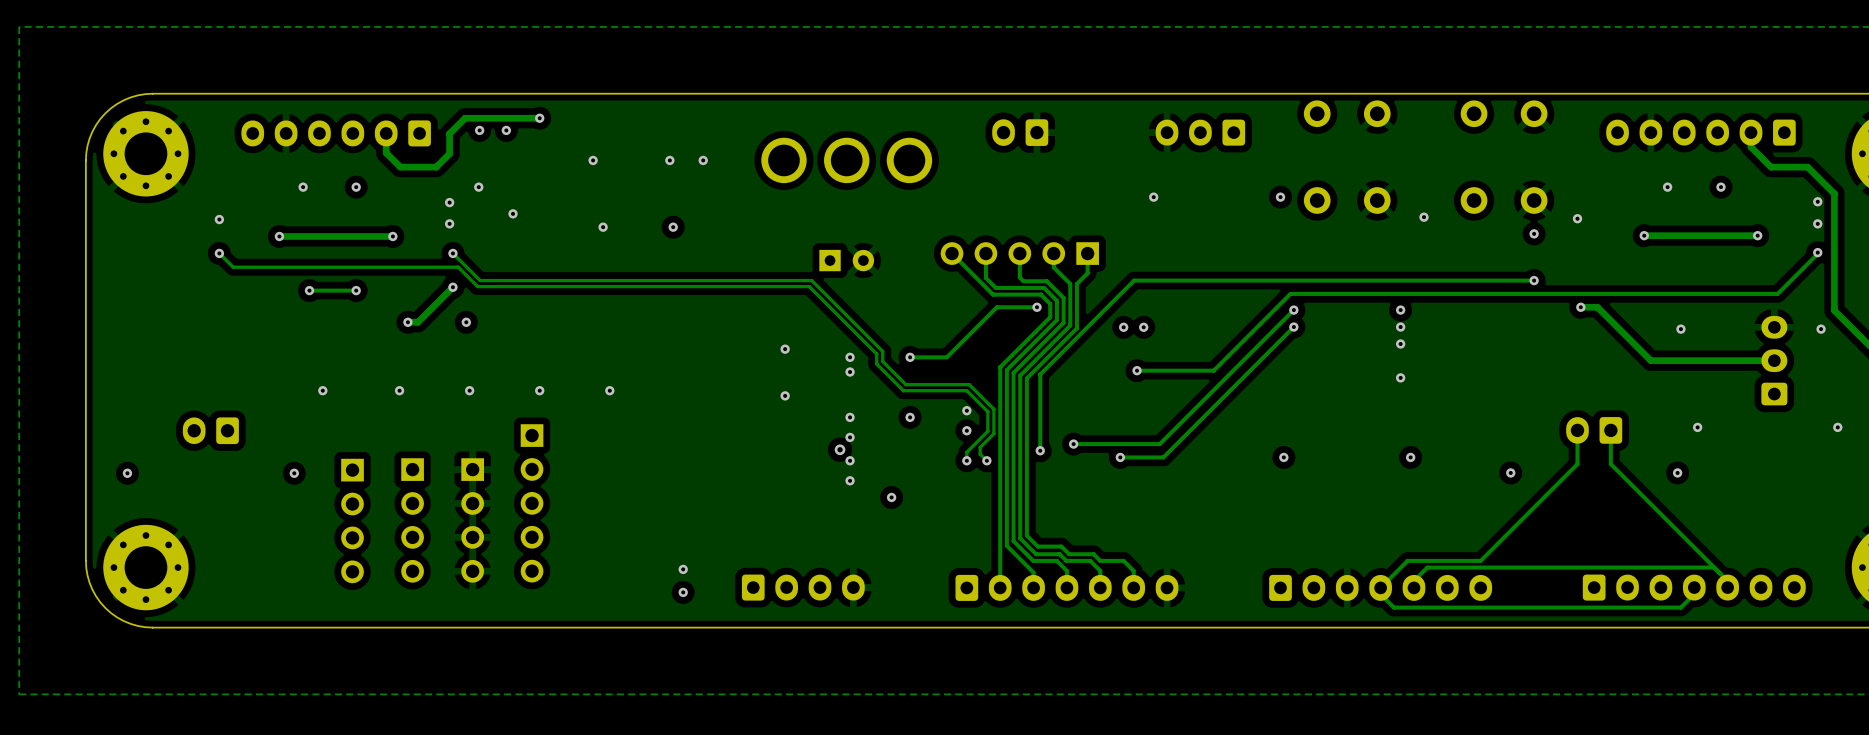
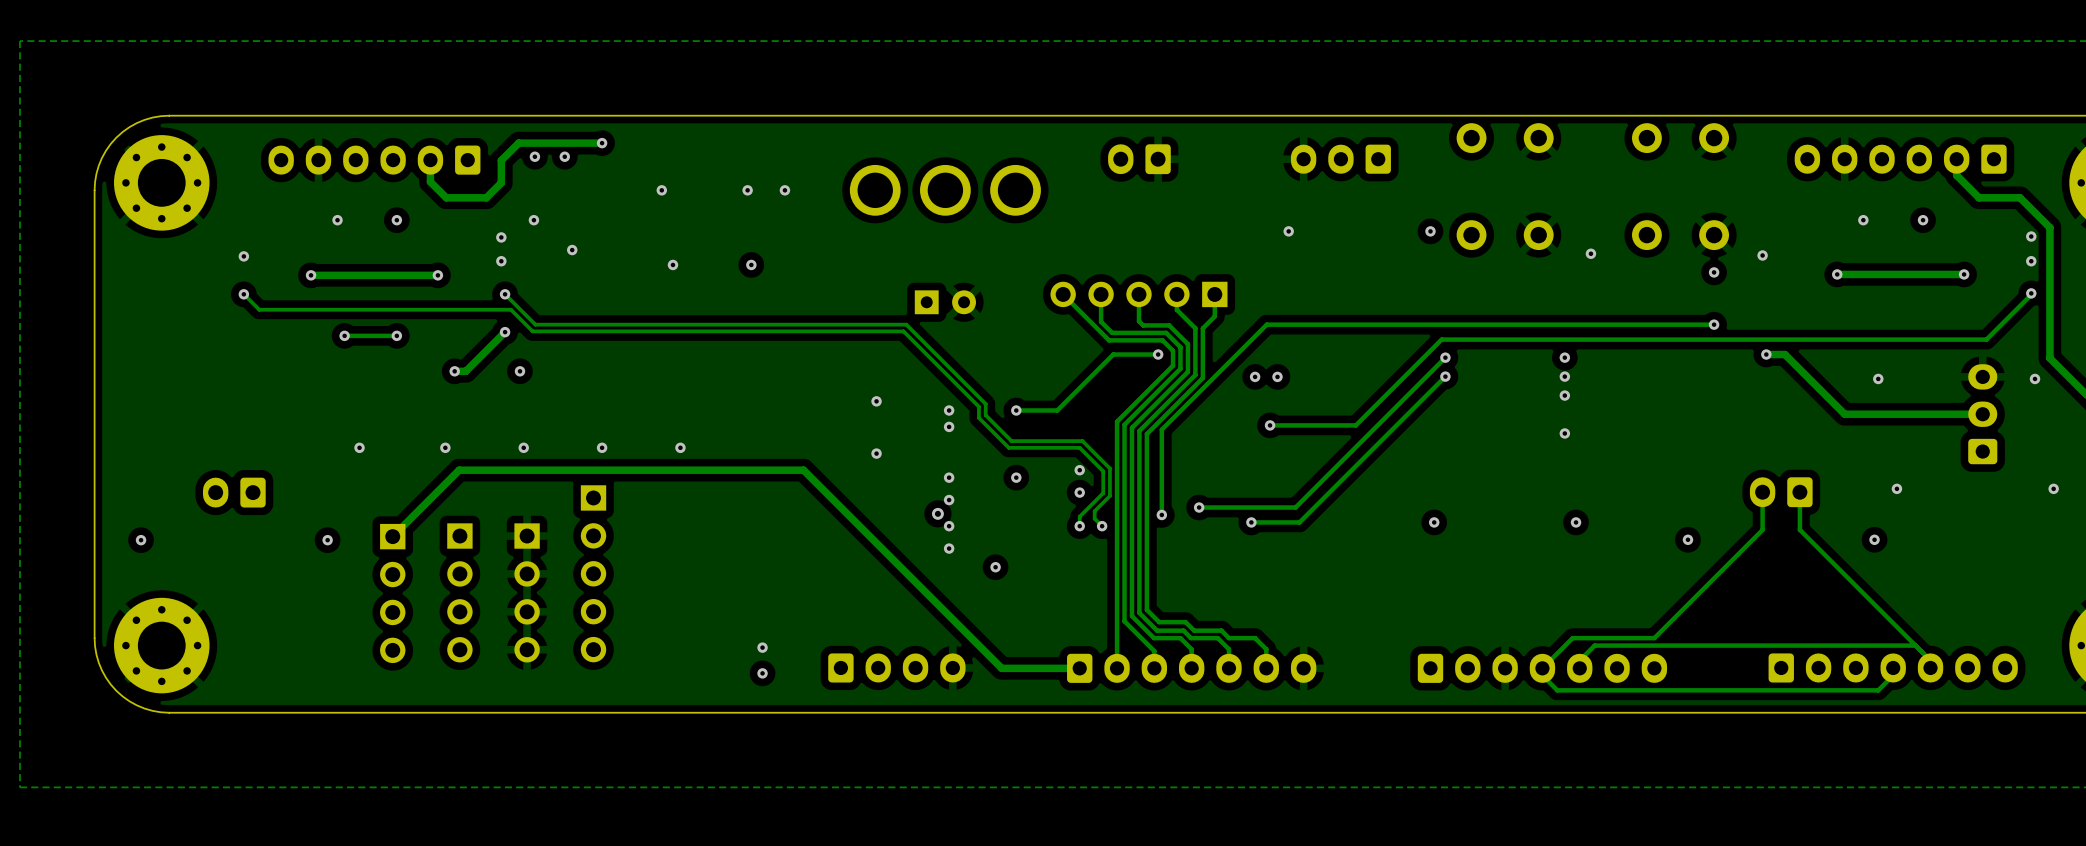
track: none -> (392, 536) (459, 470) (803, 470) (1001, 668) (1079, 668)

